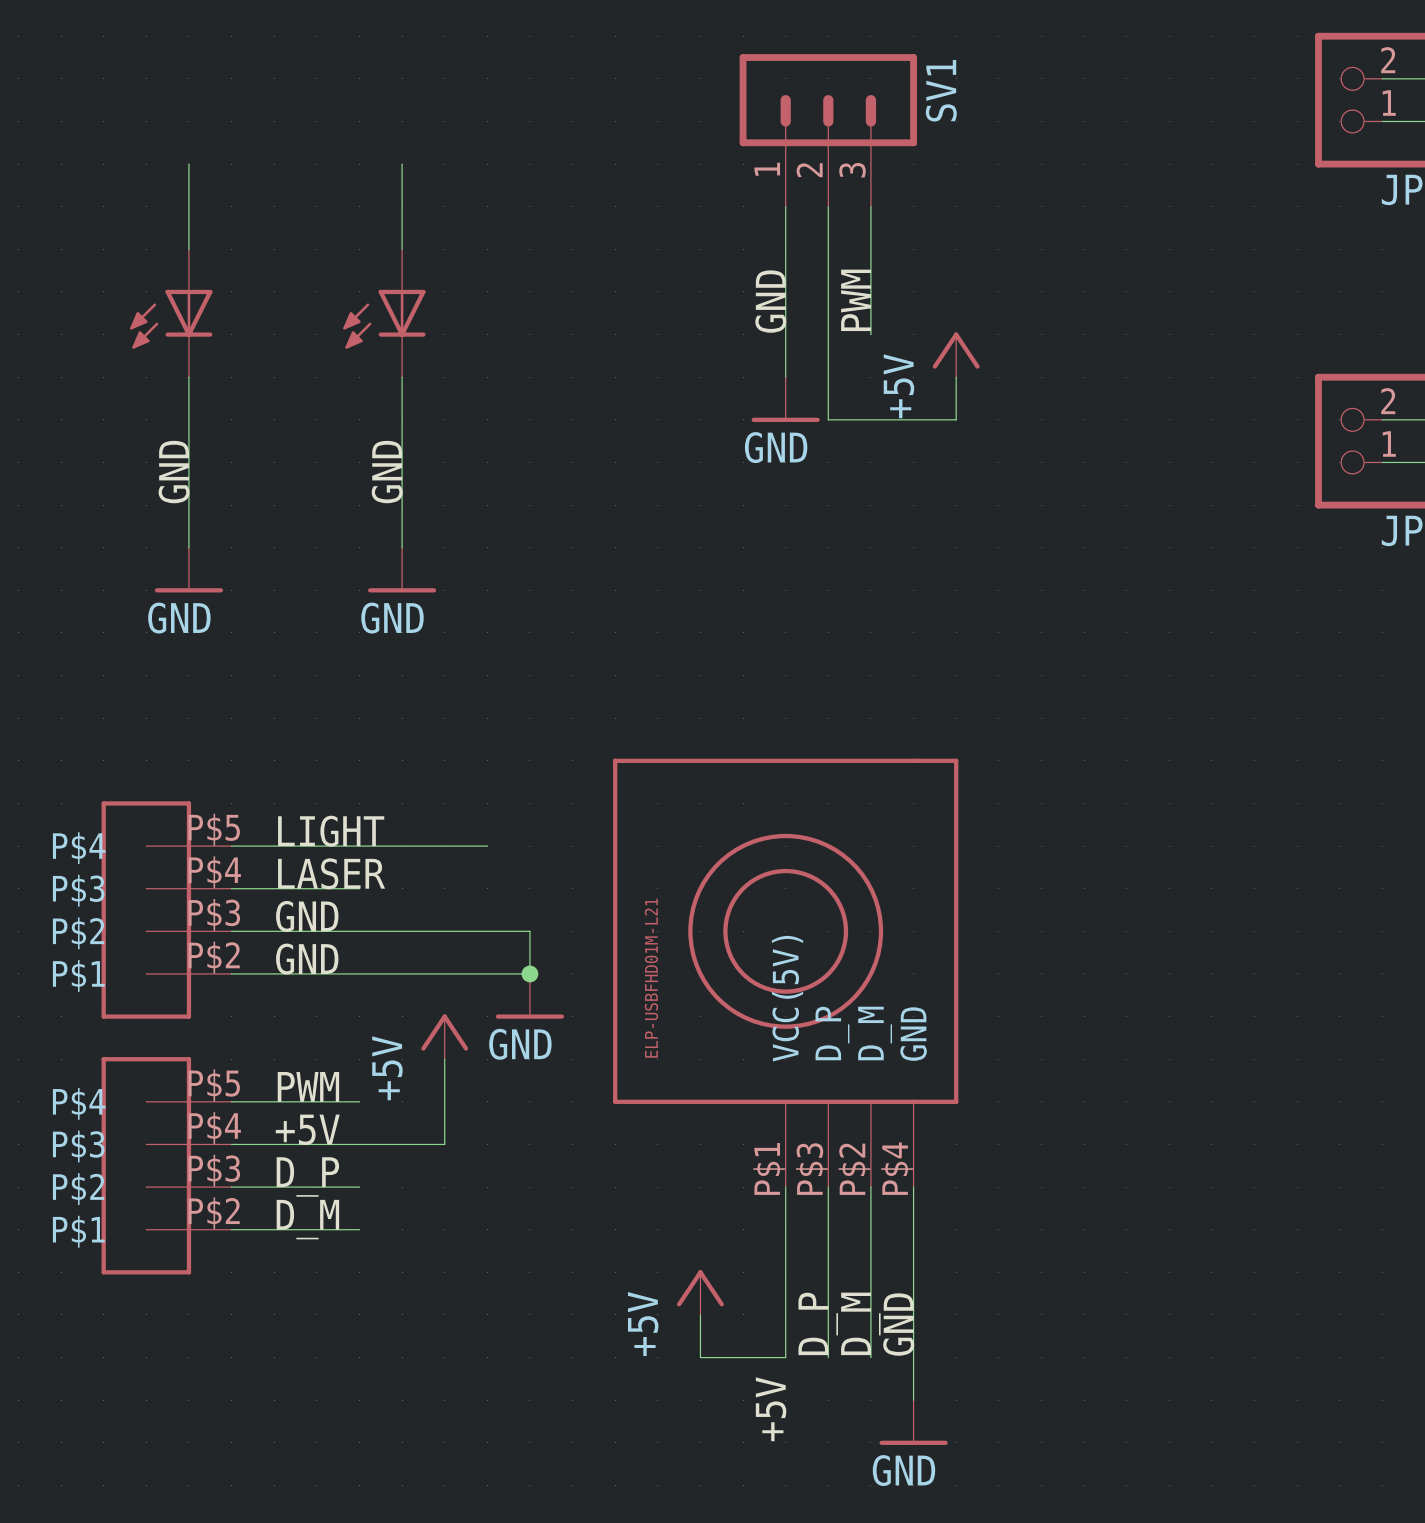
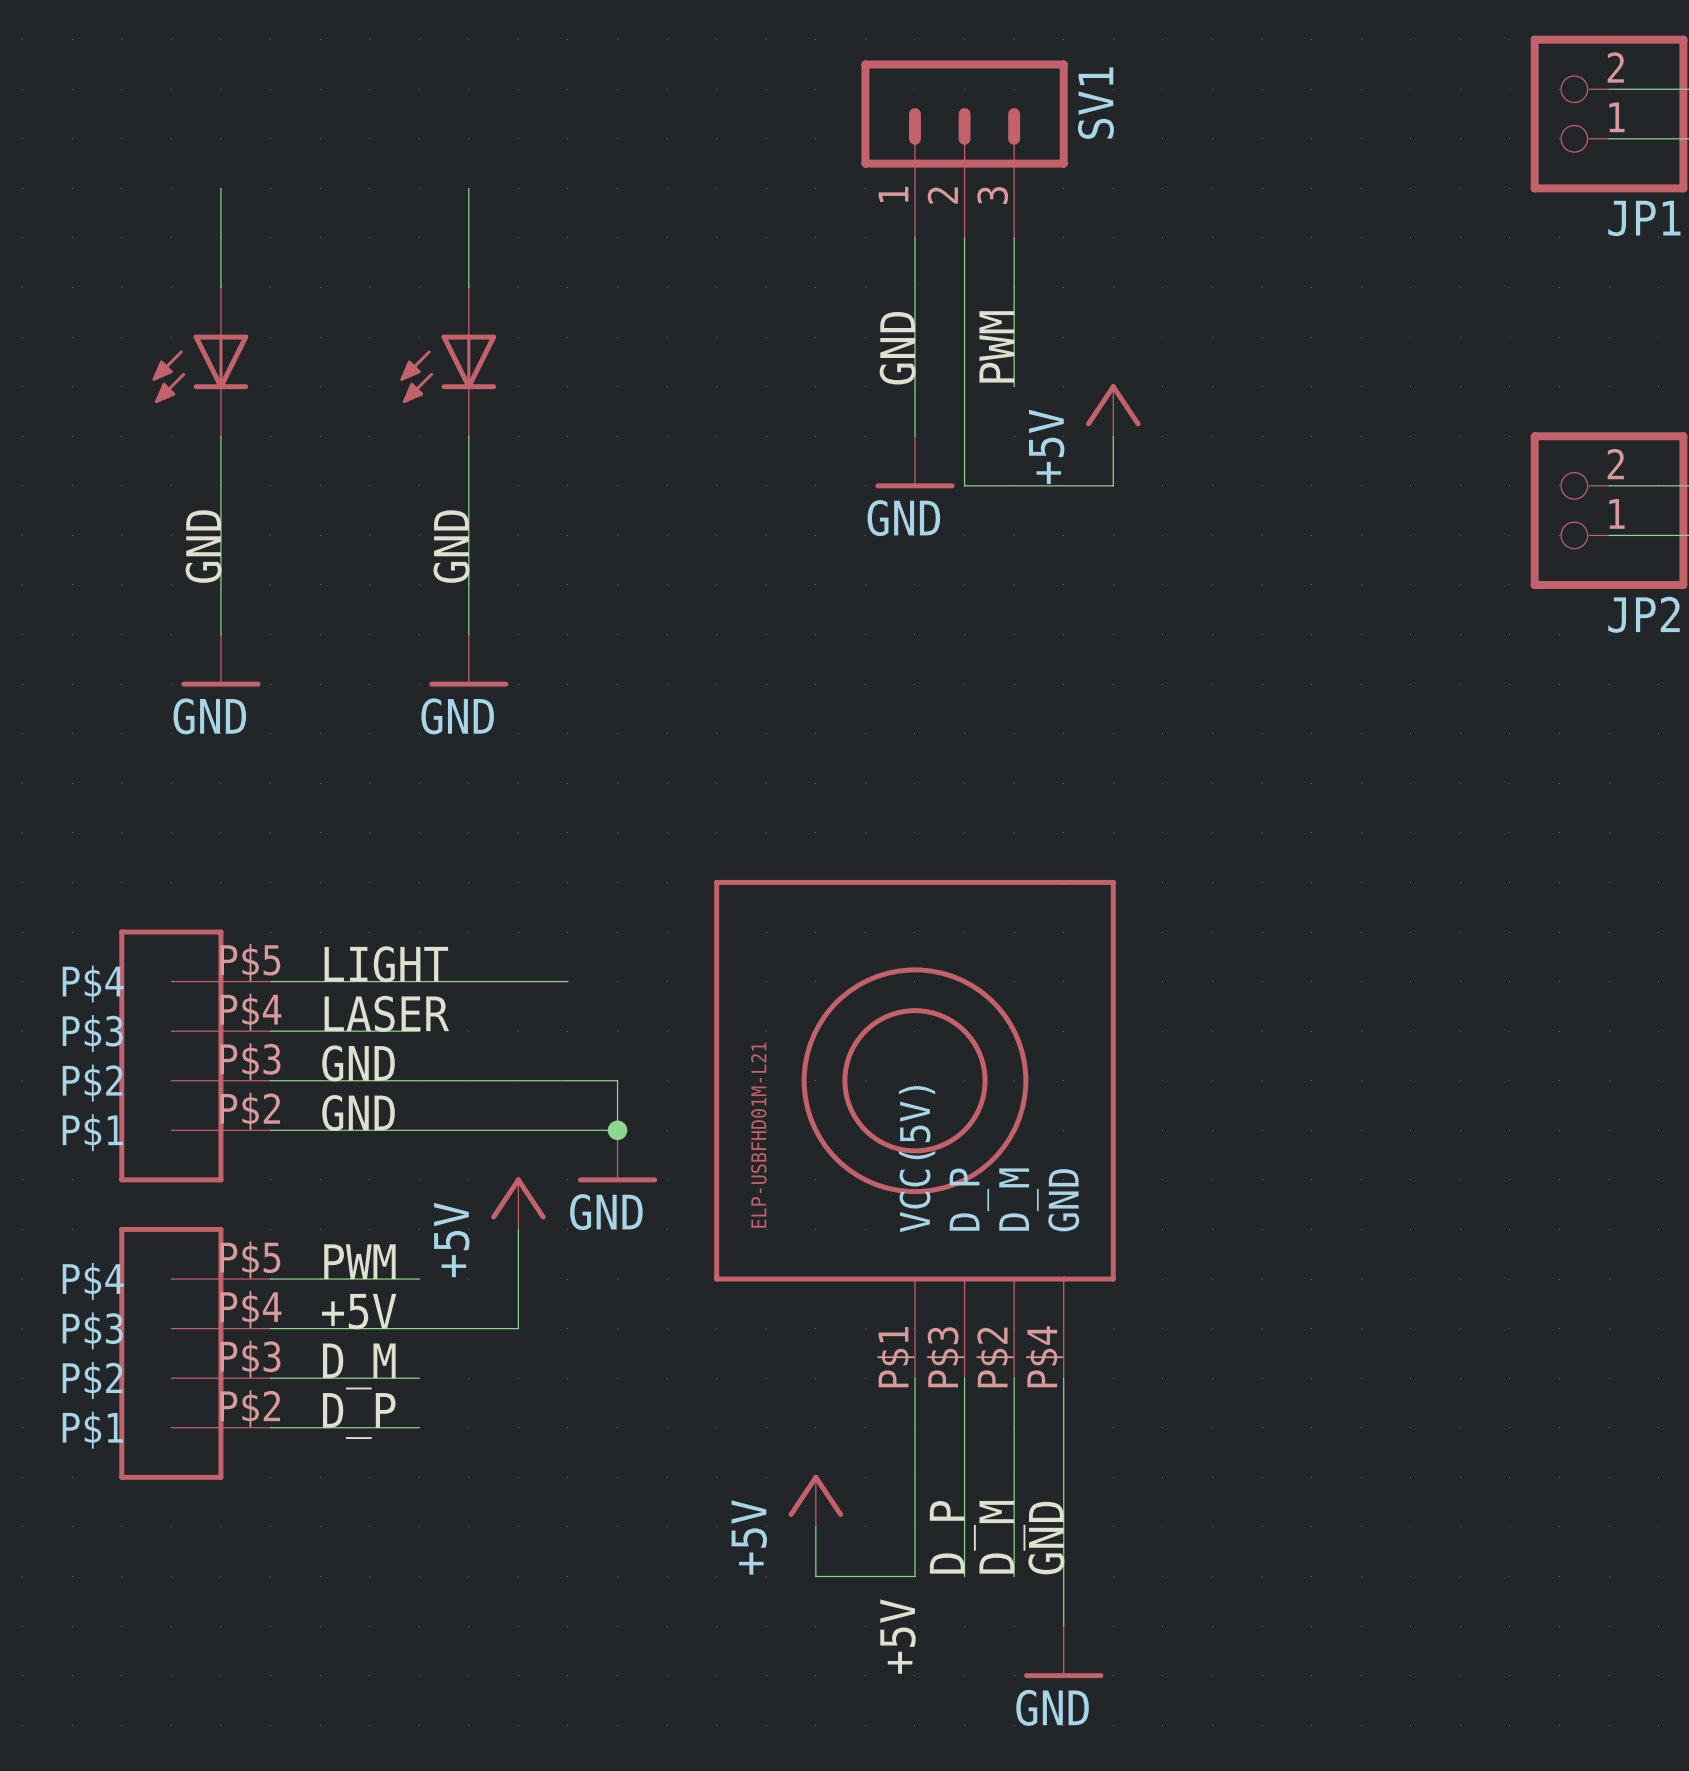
label: D_P (307, 1176) -> D_M (359, 1366)
label: D_M (307, 1219) -> D_P (359, 1416)

